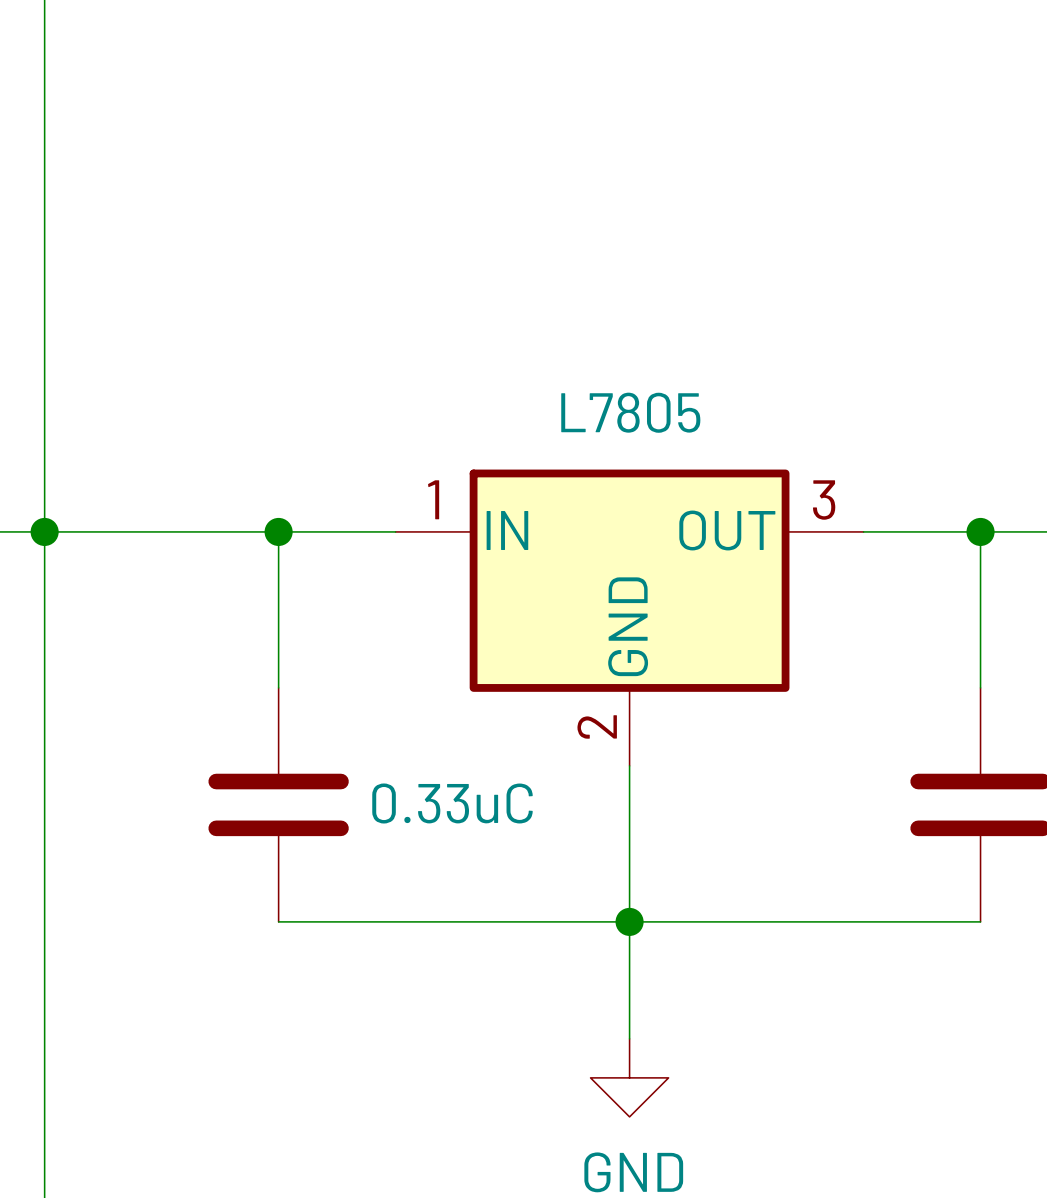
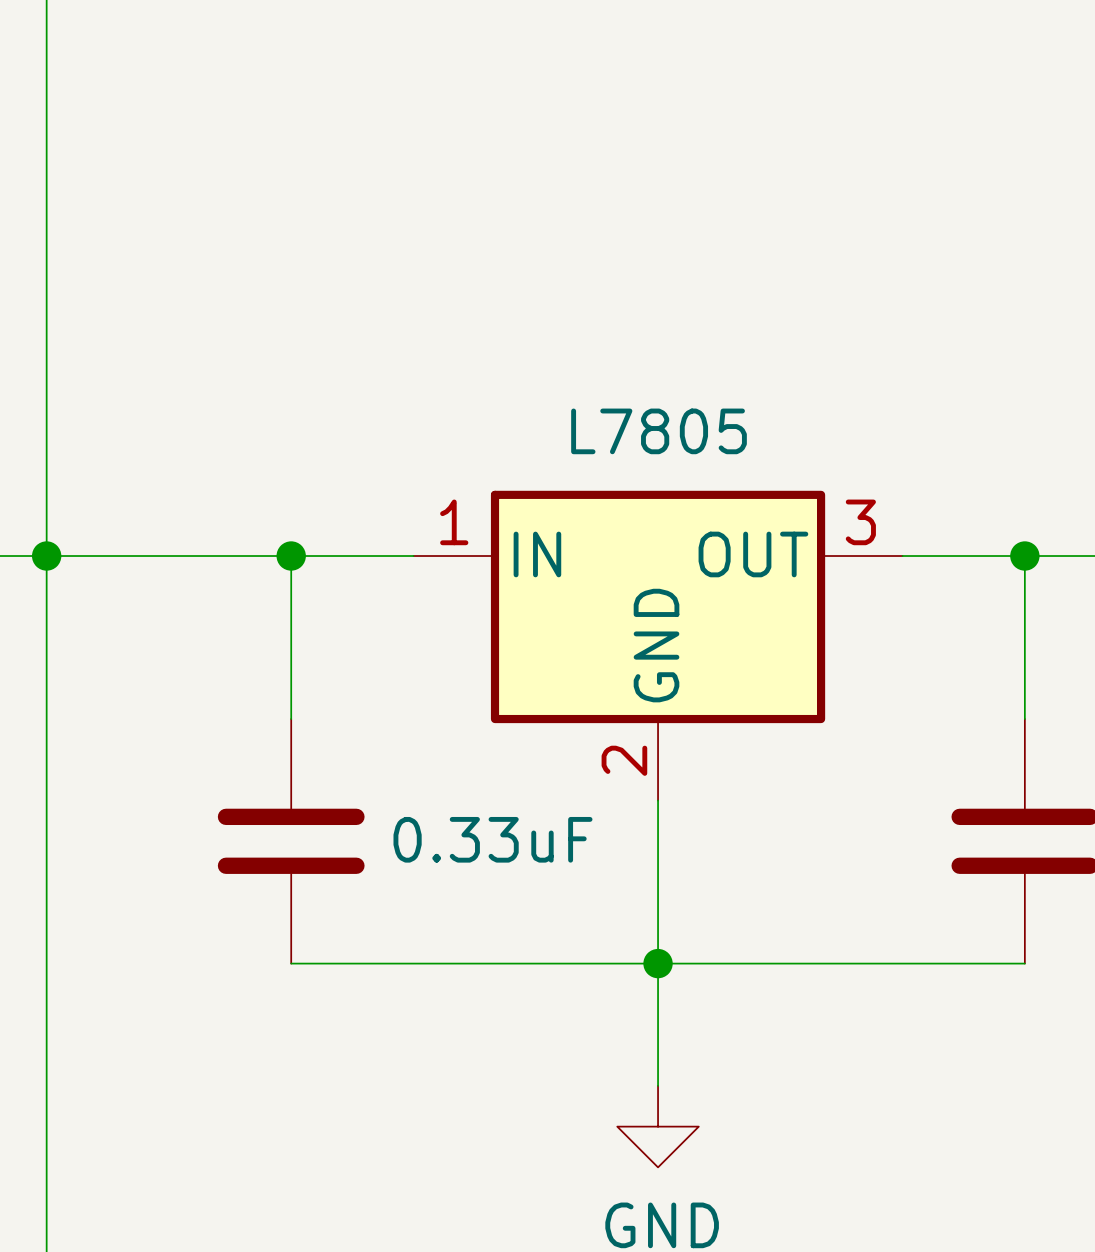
part value: 0.33uC (452, 803) -> 0.33uF (492, 839)

